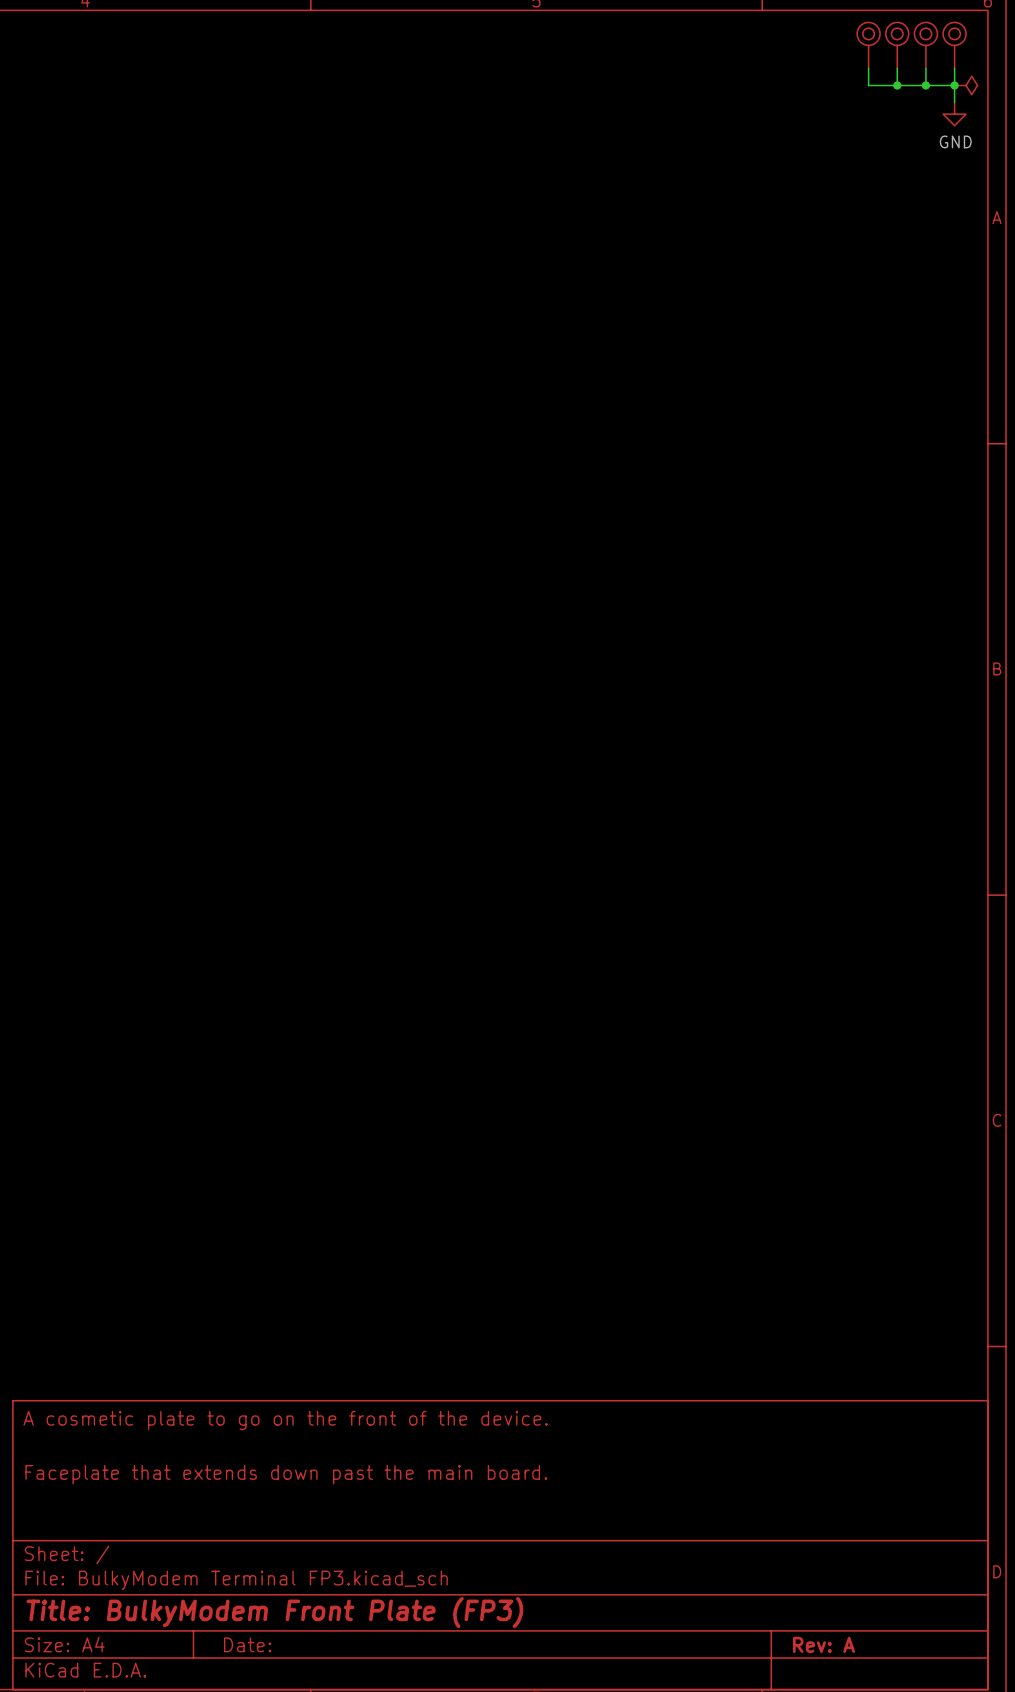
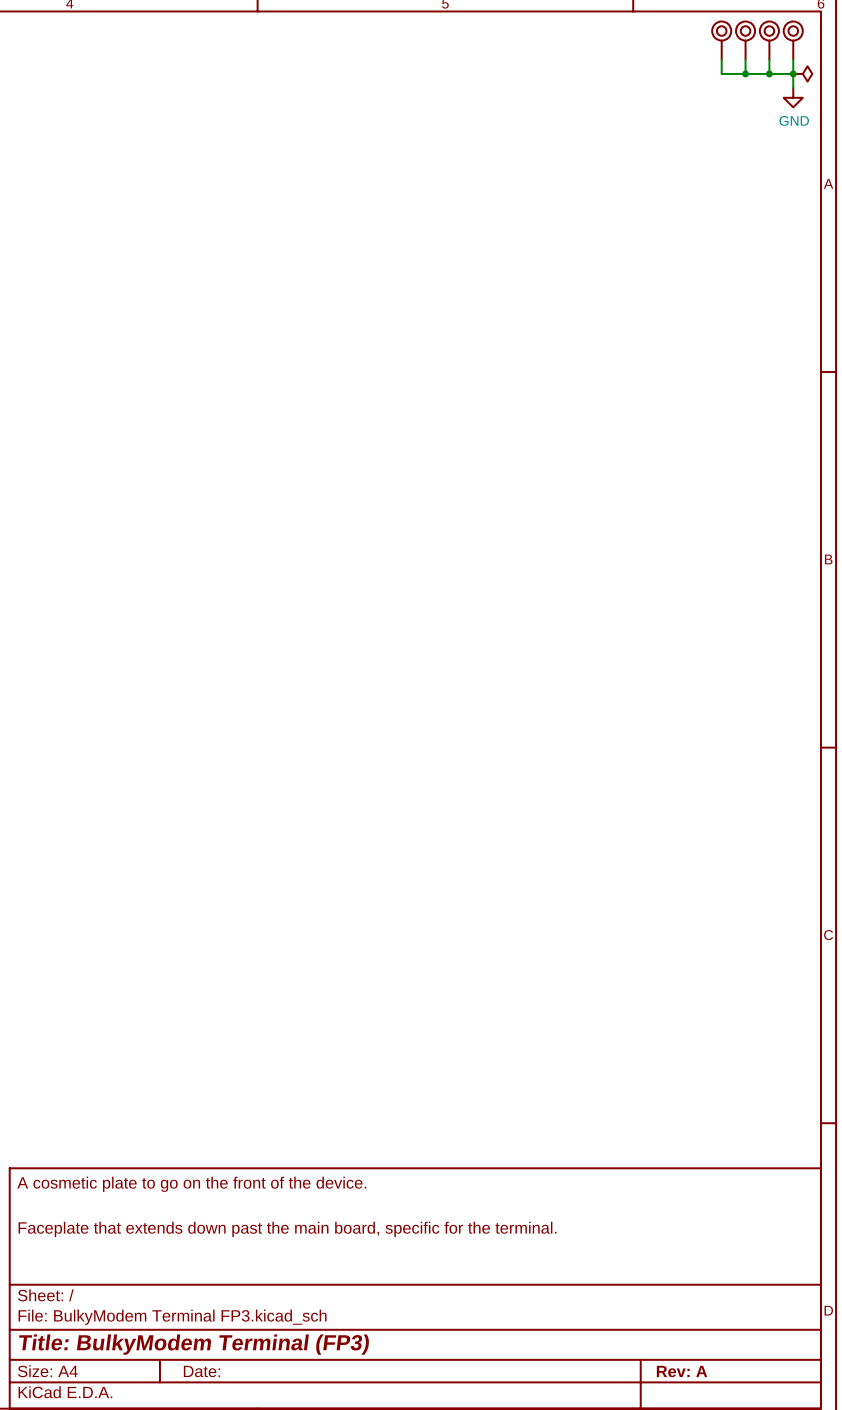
title block: Faceplate that extends down past the main board. (286, 1474) -> Faceplate that extends down past the main board, specific for the terminal. (287, 1229)
title block: Title: BulkyModem Front Plate (FP3) (274, 1612) -> Title: BulkyModem Terminal (FP3) (194, 1344)

